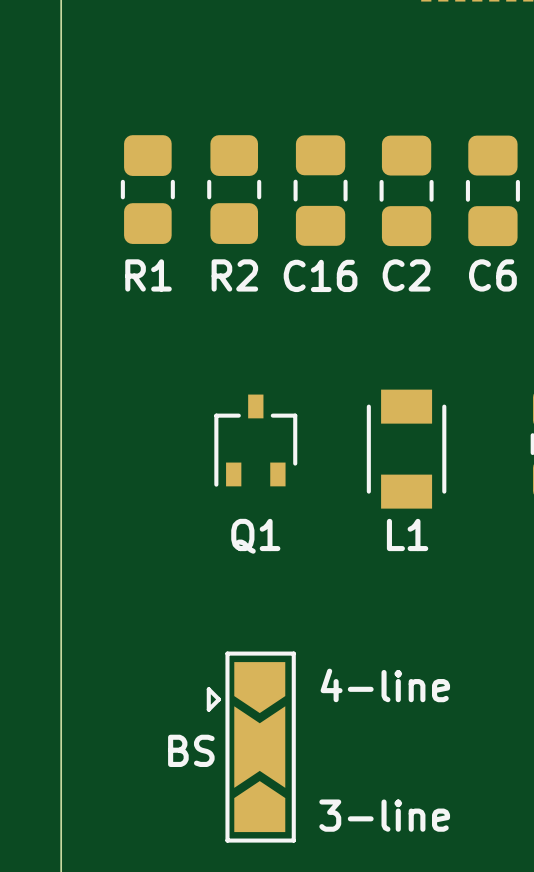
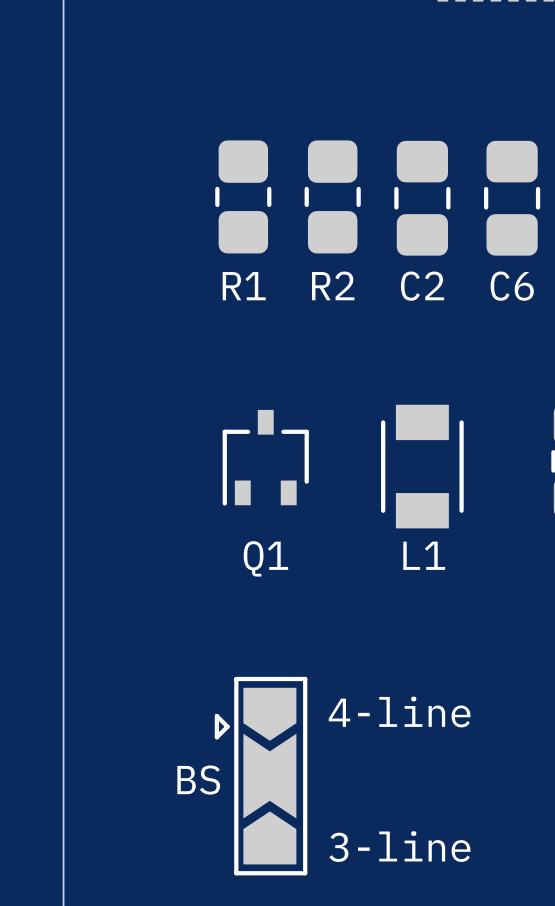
R1: (147, 189) -> none
R2: none -> (332, 196)
C16: (320, 190) -> none
R2 name: R2 (234, 275) -> R1 (244, 286)

